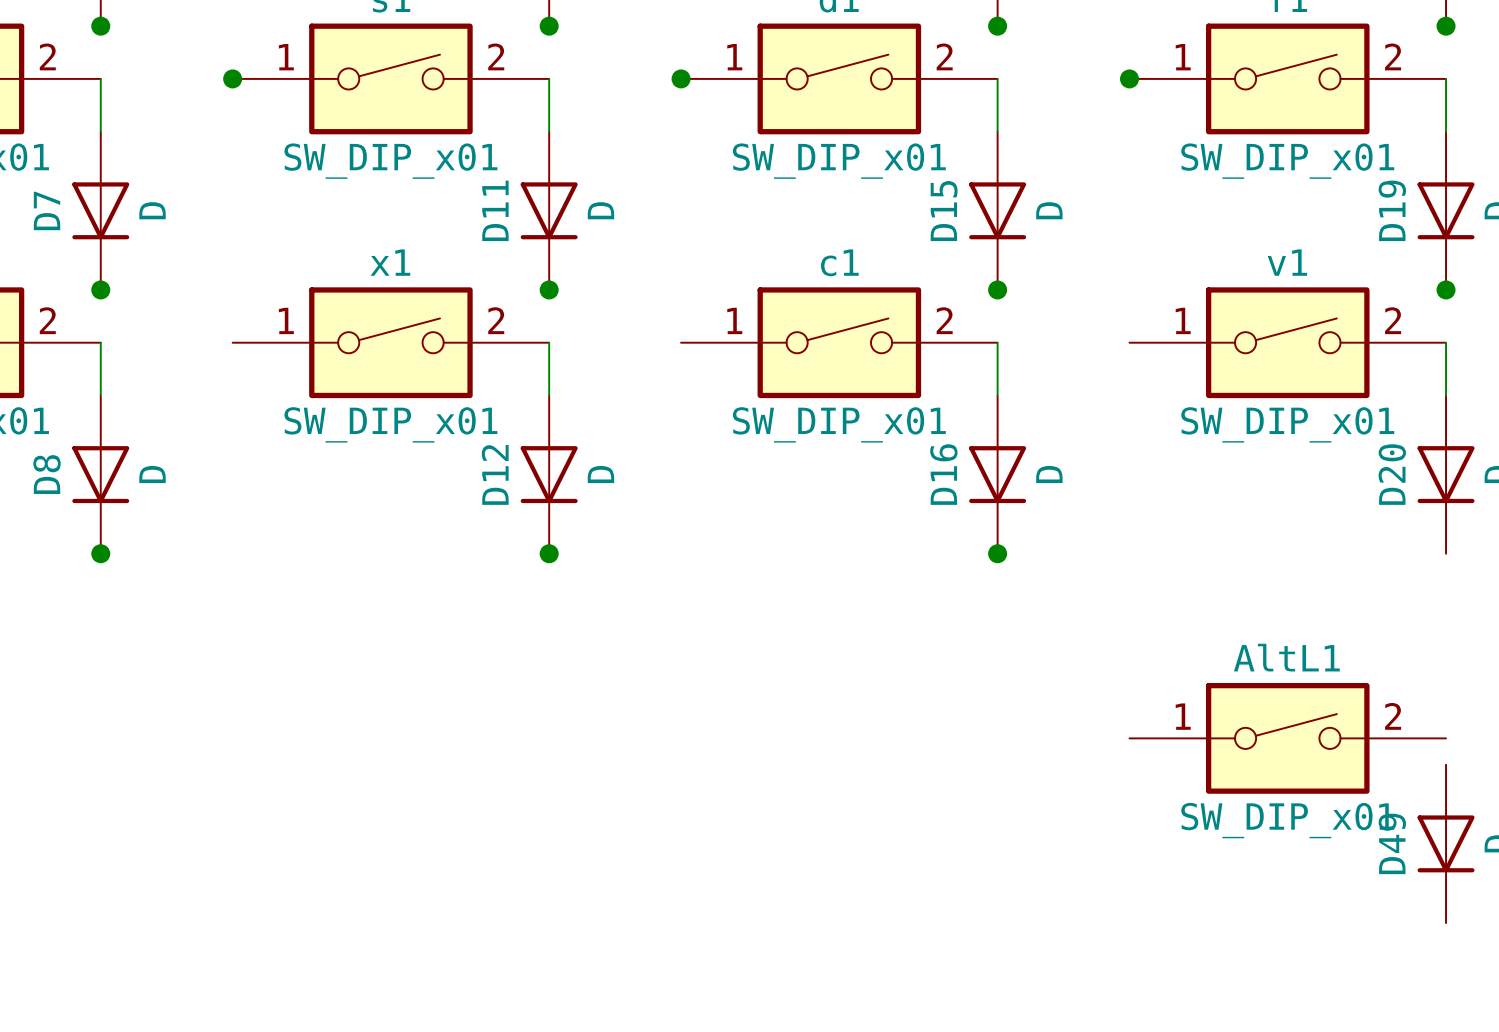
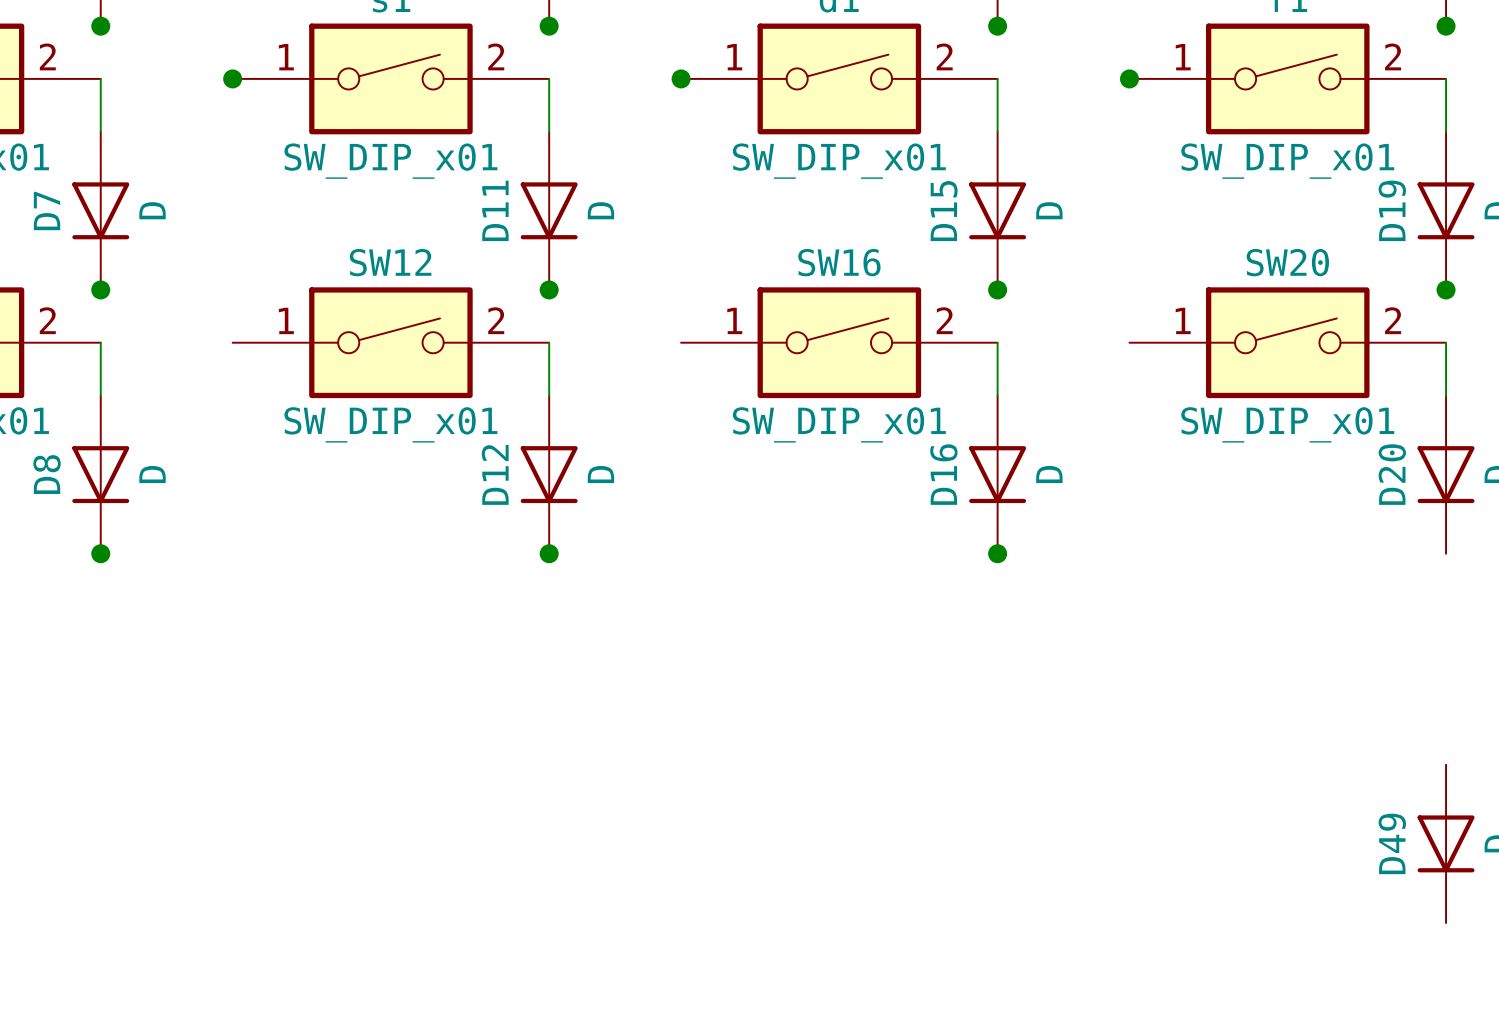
x1 name: x1 (390, 262) -> SW12 (390, 262)
c1 name: c1 (839, 262) -> SW16 (839, 262)
v1 name: v1 (1287, 262) -> SW20 (1287, 262)
AltL1: SW_DIP_x01 (1287, 738) -> none

